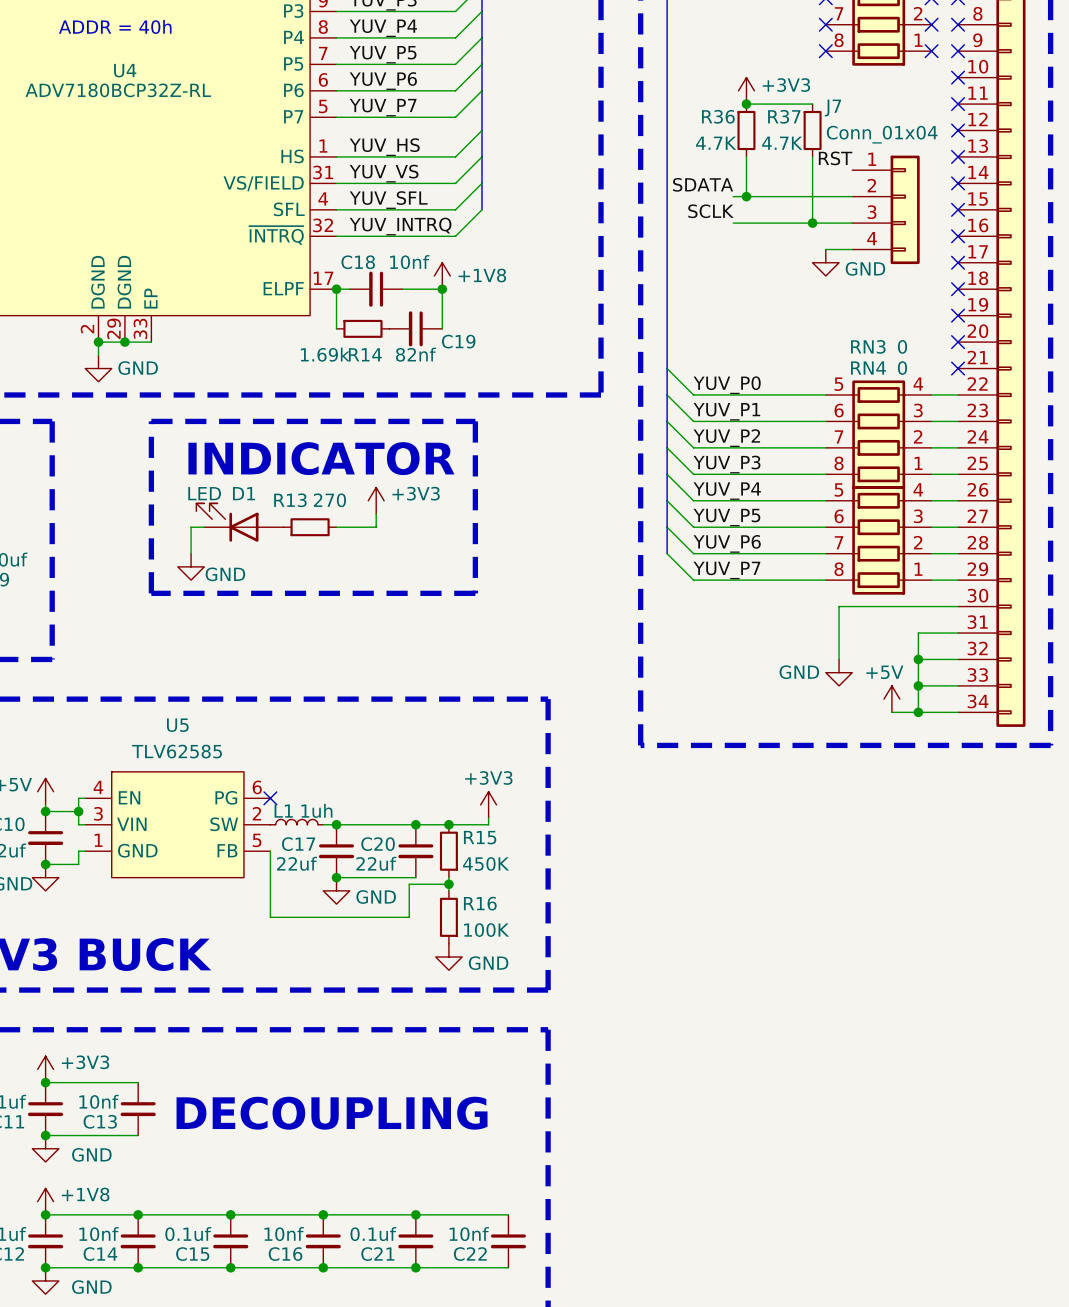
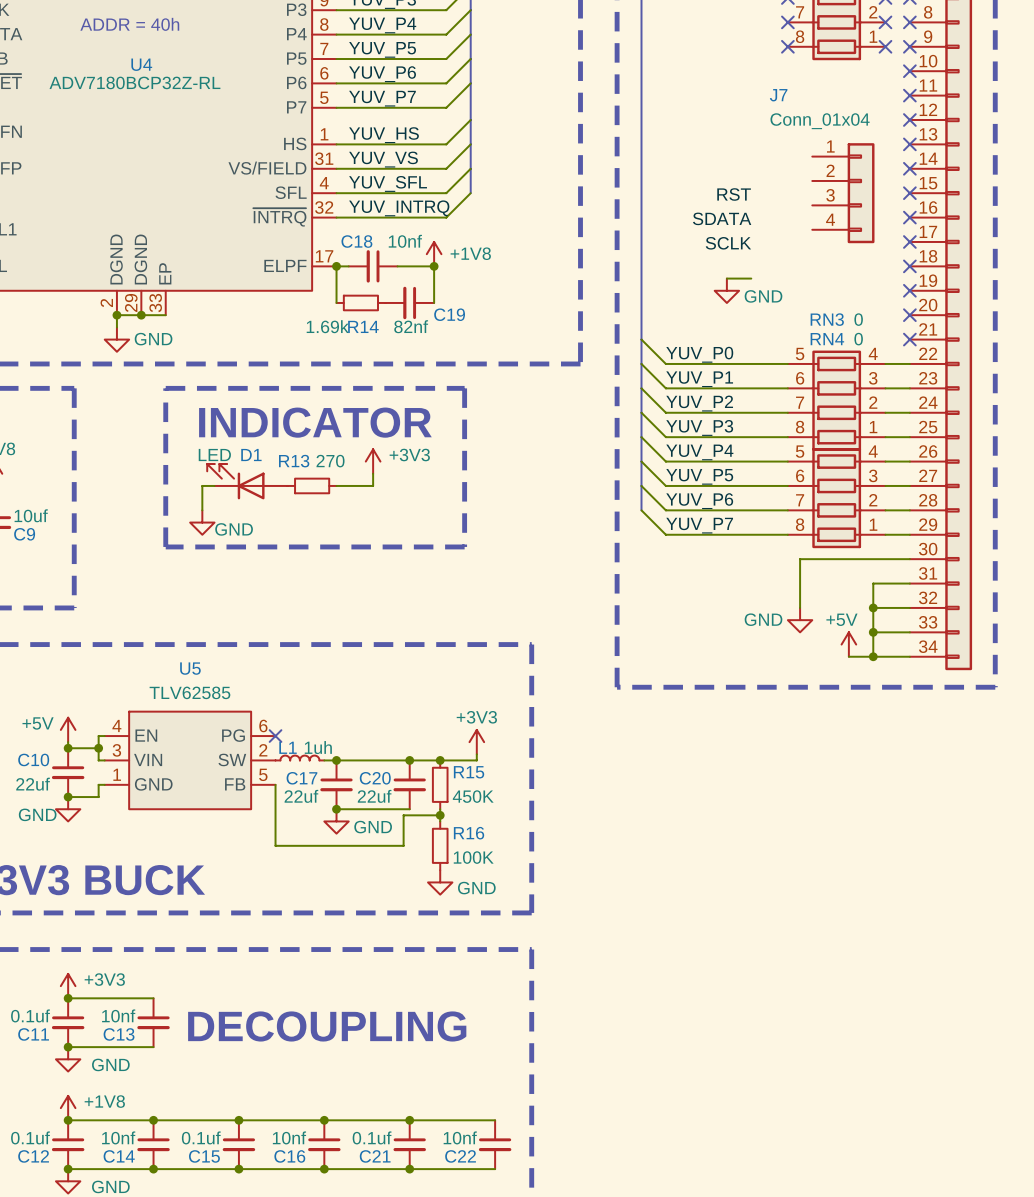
power symbol: +3V3 (746, 90) -> none
wire: (746, 104) (812, 104) -> none
junction: (746, 104) -> none
J7 name position: J7 (833, 108) -> J7 (778, 95)
R36: 4.7K (746, 130) -> none
R37: 4.7K (812, 130) -> none
J7 value position: Conn_01x04 (882, 134) -> Conn_01x04 (820, 121)
wire: (746, 156) (746, 196) -> none
wire: (812, 156) (812, 223) -> none
label position: RST (835, 158) -> RST (734, 194)
label position: SDATA (703, 184) -> SDATA (722, 218)
wire: (733, 196) (852, 196) -> none
junction: (746, 196) -> none
label position: SCLK (710, 211) -> SCLK (728, 243)
wire: (733, 223) (852, 223) -> none
junction: (812, 223) -> none
wire: (825, 249) (852, 249) -> (726, 278) (751, 278)
power symbol position: GND (825, 262) -> GND (726, 290)

